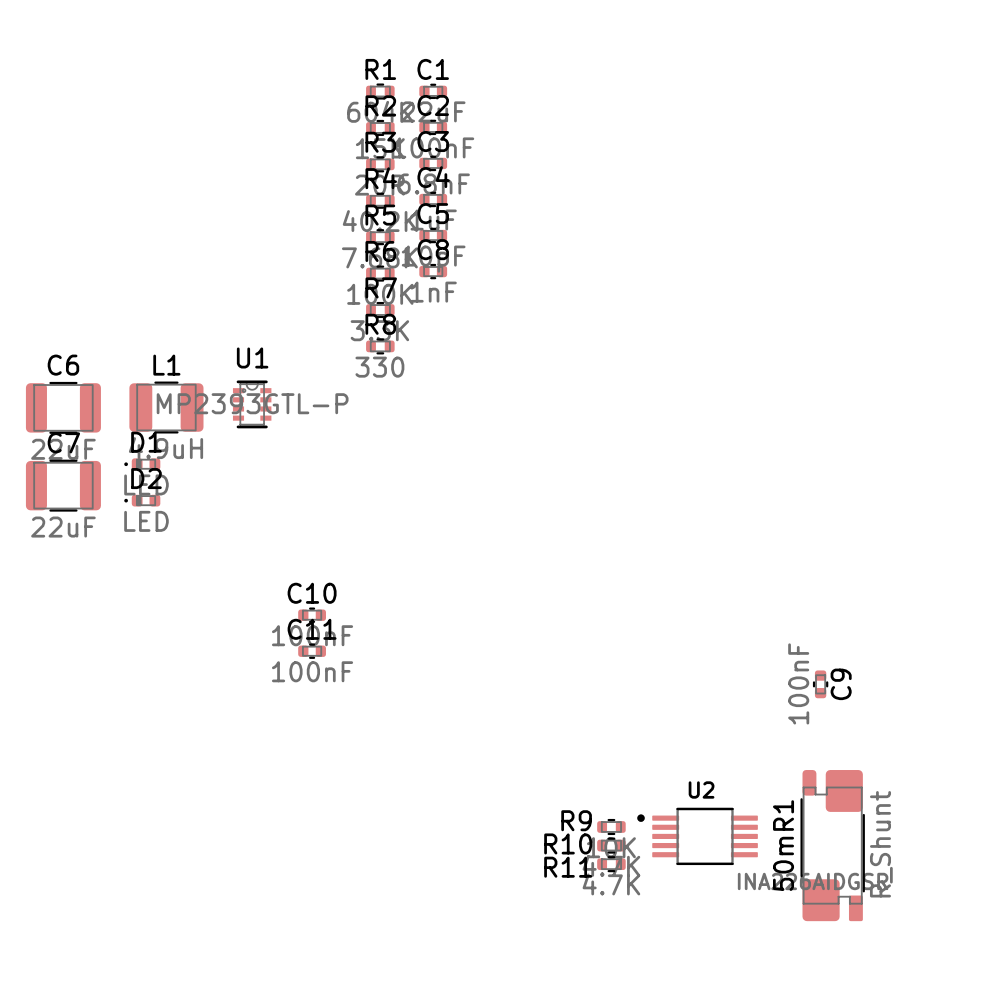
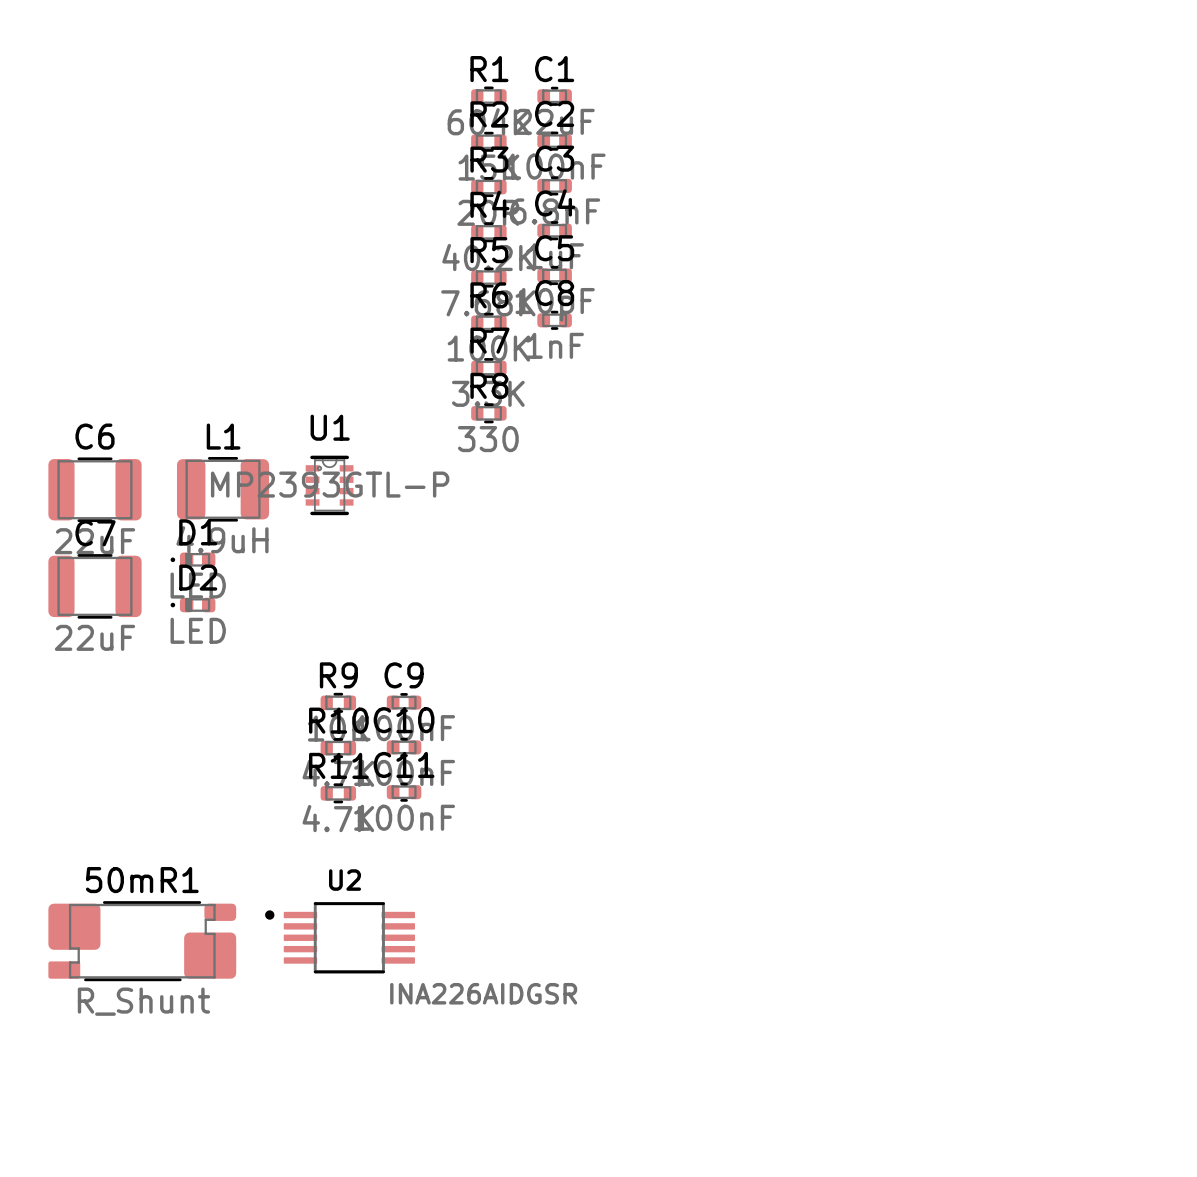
C9 rotation: 0° (820, 684) -> 90° clockwise (404, 702)
C9 position: (820, 684) -> (404, 702)
R9 name position: R9 (576, 820) -> R9 (338, 675)
R9 position: (611, 826) -> (338, 702)
U2 position: (697, 836) -> (340, 937)
R10 name position: R10 (568, 843) -> R10 (338, 720)
R10 position: (611, 845) -> (338, 748)
50mR1 rotation: 0° (832, 845) -> 90° clockwise (142, 941)
50mR1 position: (832, 845) -> (142, 941)
R11 position: (611, 864) -> (338, 793)
R11 name position: R11 (568, 867) -> R11 (338, 765)

